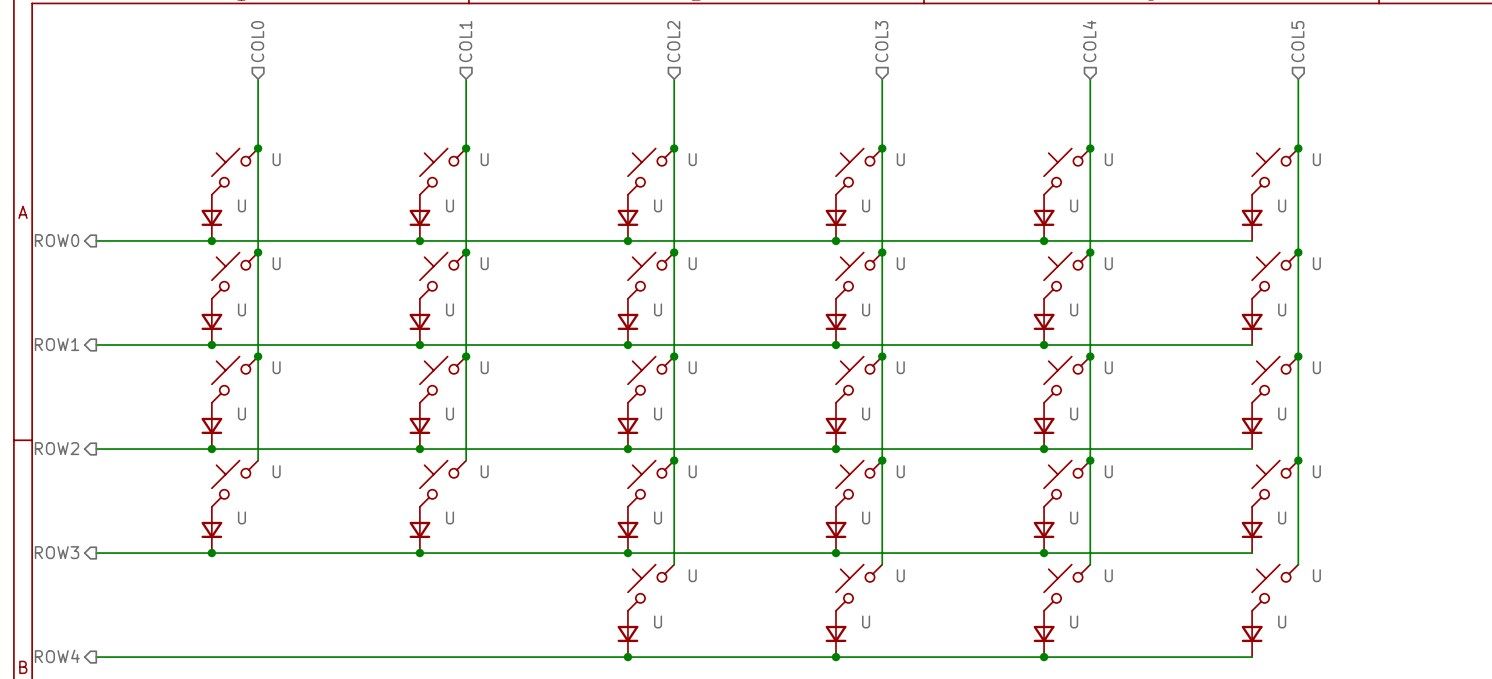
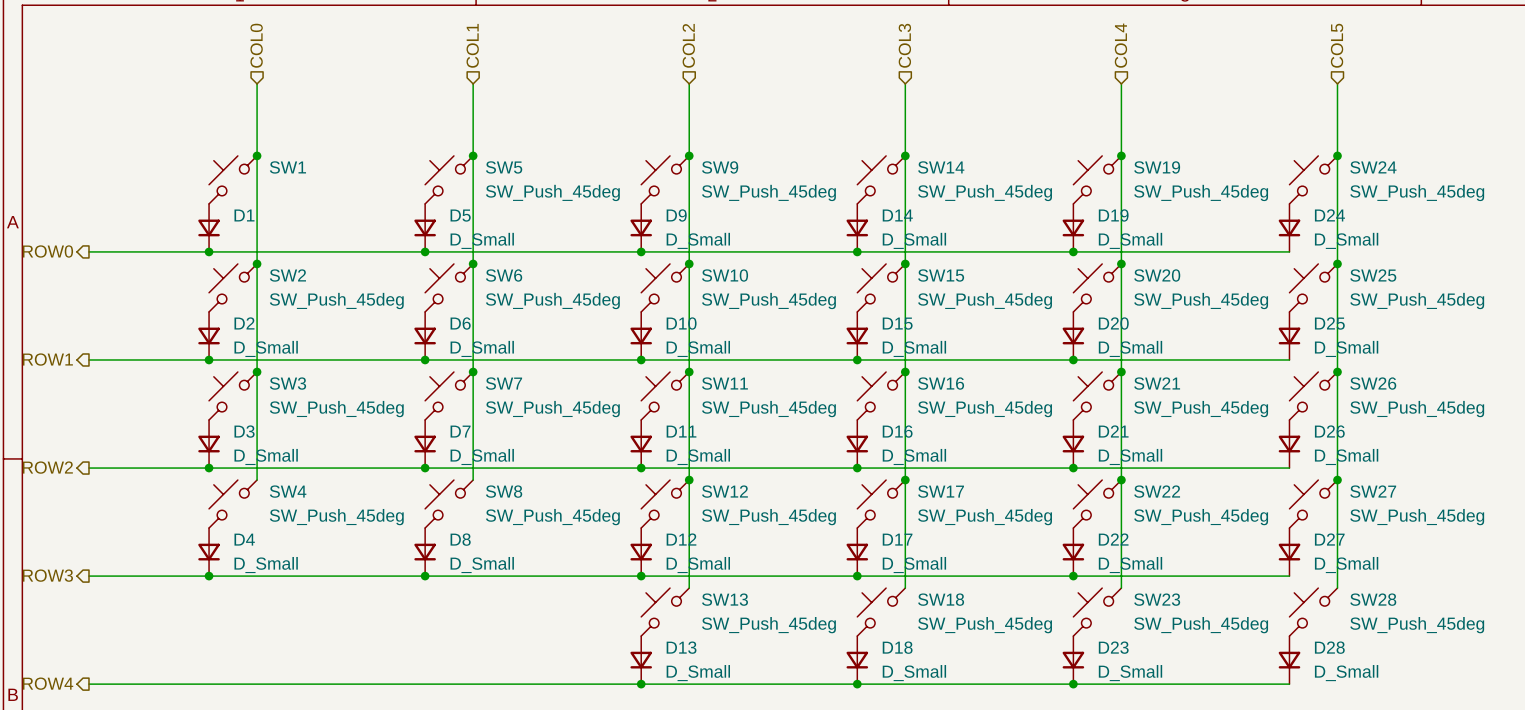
U name: U (276, 159) -> SW1 (287, 167)
U name: U (484, 159) -> SW5 (504, 167)
U name: U (692, 159) -> SW9 (720, 167)
U name: U (900, 159) -> SW14 (941, 167)
U name: U (1108, 159) -> SW19 (1157, 167)
U name: U (1316, 159) -> SW24 (1373, 167)
U value: none -> SW_Push_45deg (552, 192)
U value: none -> SW_Push_45deg (768, 192)
U value: none -> SW_Push_45deg (985, 192)
U value: none -> SW_Push_45deg (1201, 192)
U value: none -> SW_Push_45deg (1417, 192)
U name: U (241, 205) -> D1 (244, 215)
U name: U (449, 205) -> D5 (460, 215)
U name: U (658, 205) -> D9 (676, 215)
U name: U (866, 205) -> D14 (897, 215)
U name: U (1074, 205) -> D19 (1113, 215)
U name: U (1282, 205) -> D24 (1329, 215)
U value: none -> D_Small (482, 240)
U value: none -> D_Small (698, 240)
U value: none -> D_Small (914, 240)
U value: none -> D_Small (1130, 240)
U value: none -> D_Small (1346, 240)
U name: U (276, 263) -> SW2 (287, 275)
U name: U (484, 263) -> SW6 (504, 275)
U name: U (692, 263) -> SW10 (725, 275)
U name: U (900, 263) -> SW15 (941, 275)
U name: U (1108, 263) -> SW20 (1157, 275)
U name: U (1316, 263) -> SW25 (1373, 275)
U value: none -> SW_Push_45deg (336, 301)
U value: none -> SW_Push_45deg (552, 301)
U value: none -> SW_Push_45deg (768, 301)
U value: none -> SW_Push_45deg (985, 301)
U value: none -> SW_Push_45deg (1201, 301)
U value: none -> SW_Push_45deg (1417, 301)
U name: U (241, 309) -> D2 (244, 323)
U name: U (449, 309) -> D6 (460, 323)
U name: U (658, 309) -> D10 (681, 323)
U name: U (866, 309) -> D15 (897, 323)
U name: U (1074, 309) -> D20 (1113, 323)
U name: U (1282, 309) -> D25 (1329, 323)
U value: none -> D_Small (266, 348)
U value: none -> D_Small (482, 348)
U value: none -> D_Small (698, 348)
U value: none -> D_Small (914, 348)
U value: none -> D_Small (1130, 348)
U value: none -> D_Small (1346, 348)
U name: U (276, 367) -> SW3 (287, 383)
U name: U (484, 367) -> SW7 (504, 383)
U name: U (692, 367) -> SW11 (724, 383)
U name: U (900, 367) -> SW16 (941, 383)
U name: U (1108, 367) -> SW21 (1157, 383)
U name: U (1316, 367) -> SW26 (1373, 383)
U value: none -> SW_Push_45deg (336, 409)
U value: none -> SW_Push_45deg (552, 409)
U value: none -> SW_Push_45deg (768, 409)
U value: none -> SW_Push_45deg (985, 409)
U value: none -> SW_Push_45deg (1201, 409)
U value: none -> SW_Push_45deg (1417, 409)
U name: U (241, 413) -> D3 (244, 431)
U name: U (449, 413) -> D7 (460, 431)
U name: U (658, 413) -> D11 (681, 431)
U name: U (866, 413) -> D16 (897, 431)
U name: U (1074, 413) -> D21 (1113, 431)
U name: U (1282, 413) -> D26 (1329, 431)
U value: none -> D_Small (266, 456)
U value: none -> D_Small (482, 456)
U value: none -> D_Small (698, 456)
U value: none -> D_Small (914, 456)
U value: none -> D_Small (1130, 456)
U value: none -> D_Small (1346, 456)
U name: U (276, 471) -> SW4 (288, 491)
U name: U (484, 471) -> SW8 (504, 491)
U name: U (692, 471) -> SW12 (724, 491)
U name: U (900, 471) -> SW17 (941, 491)
U name: U (1108, 471) -> SW22 (1157, 491)
U name: U (1316, 471) -> SW27 (1373, 491)
U value: none -> SW_Push_45deg (336, 517)
U value: none -> SW_Push_45deg (552, 517)
U value: none -> SW_Push_45deg (768, 517)
U value: none -> SW_Push_45deg (985, 517)
U value: none -> SW_Push_45deg (1201, 517)
U value: none -> SW_Push_45deg (1417, 517)
U name: U (241, 517) -> D4 (244, 539)
U name: U (449, 517) -> D8 (460, 539)
U name: U (658, 517) -> D12 (681, 539)
U name: U (866, 517) -> D17 (897, 539)
U name: U (1074, 517) -> D22 (1113, 539)
U name: U (1282, 517) -> D27 (1329, 539)
U value: none -> D_Small (266, 565)
U value: none -> D_Small (482, 565)
U value: none -> D_Small (698, 565)
U value: none -> D_Small (914, 565)
U value: none -> D_Small (1130, 565)
U value: none -> D_Small (1346, 565)
U name: U (692, 575) -> SW13 (725, 599)
U name: U (900, 575) -> SW18 (941, 599)
U name: U (1108, 575) -> SW23 (1157, 599)
U name: U (1316, 575) -> SW28 (1373, 599)
U value: none -> SW_Push_45deg (768, 625)
U value: none -> SW_Push_45deg (985, 625)
U value: none -> SW_Push_45deg (1201, 625)
U value: none -> SW_Push_45deg (1417, 625)
U name: U (658, 621) -> D13 (681, 647)
U name: U (866, 621) -> D18 (897, 647)
U name: U (1074, 621) -> D23 (1113, 647)
U name: U (1282, 621) -> D28 (1329, 647)
U value: none -> D_Small (698, 673)
U value: none -> D_Small (914, 673)
U value: none -> D_Small (1130, 673)
U value: none -> D_Small (1346, 673)

